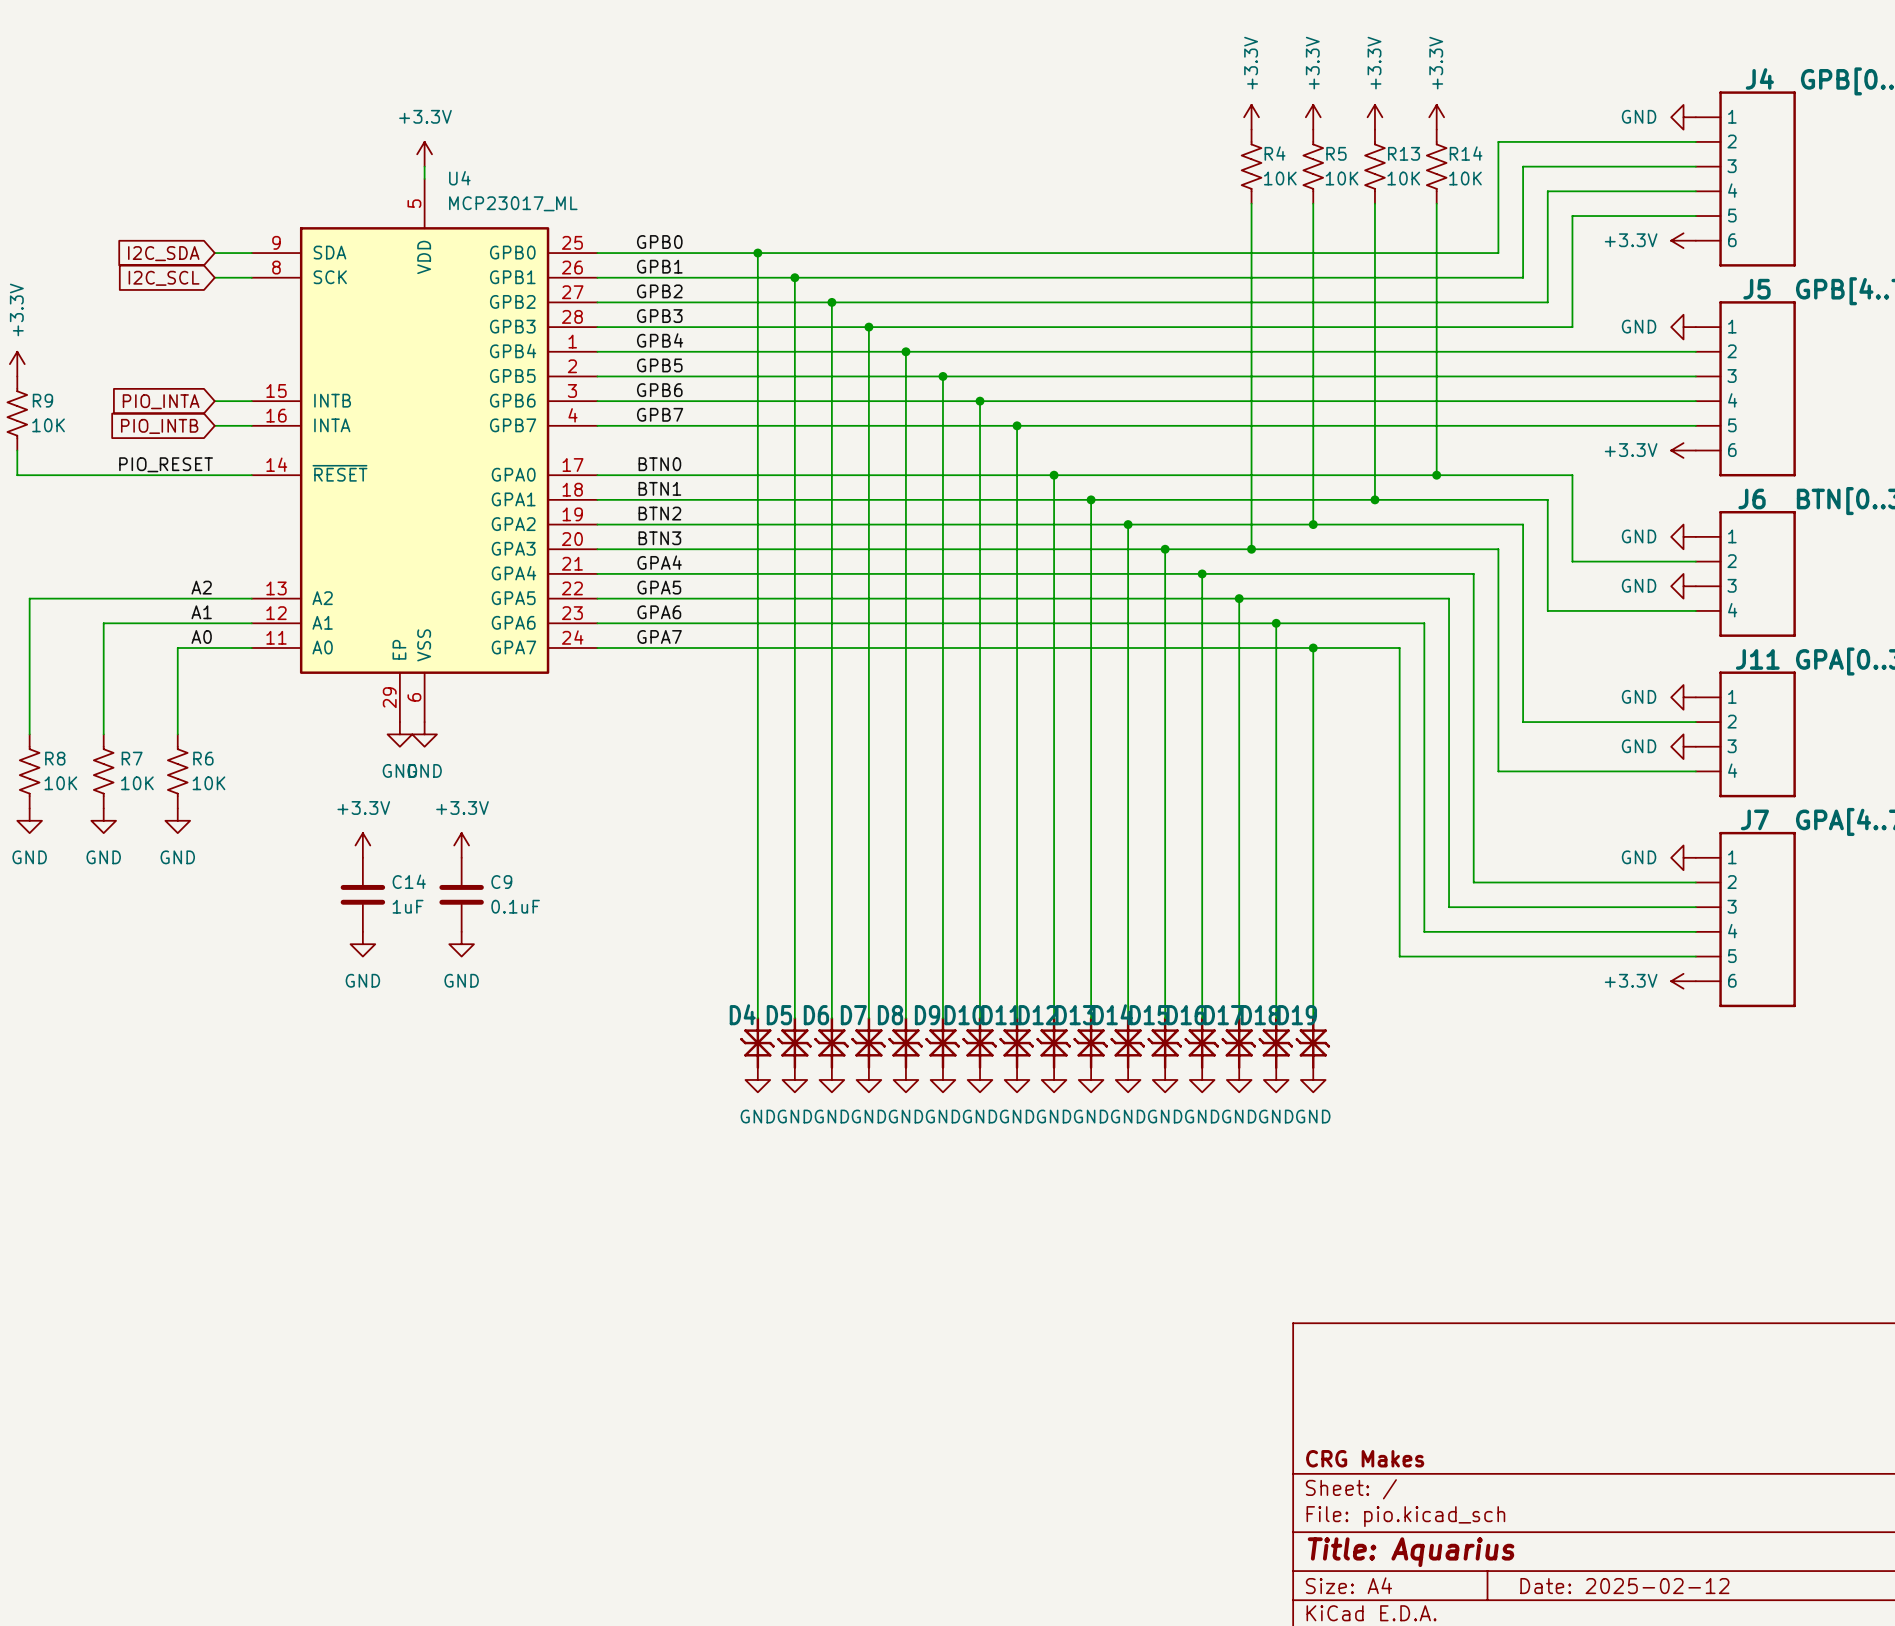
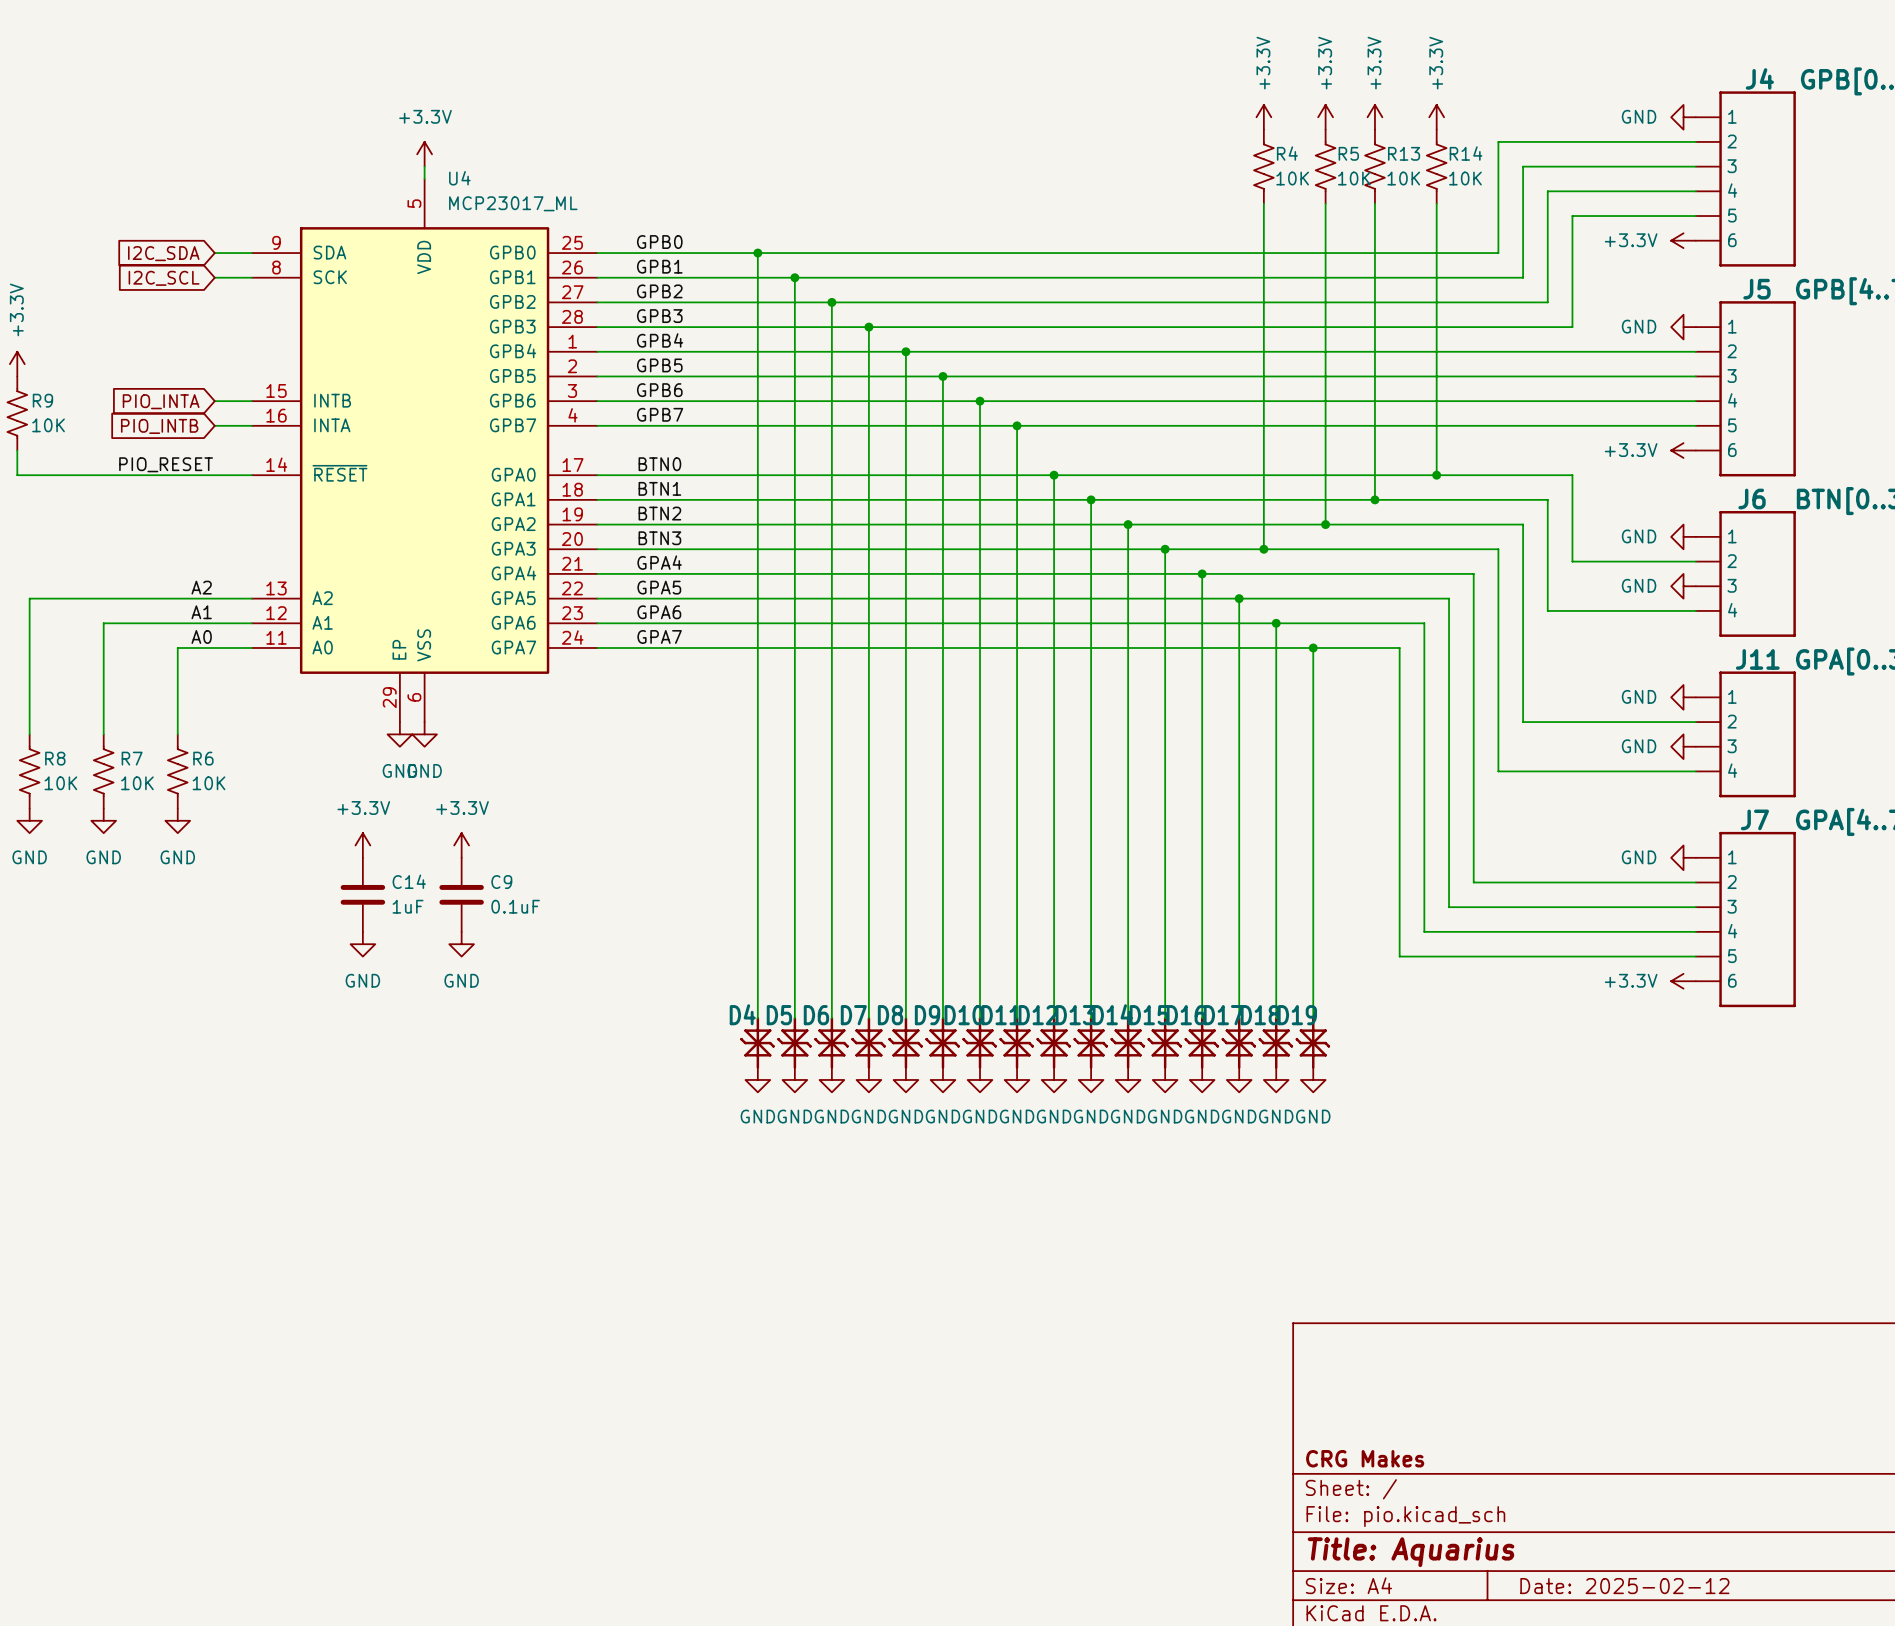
power symbol position: +3.3V (1251, 117) -> +3.3V (1263, 117)
power symbol position: +3.3V (1313, 117) -> +3.3V (1325, 117)
R4 position: (1251, 166) -> (1263, 166)
R5 position: (1313, 166) -> (1325, 166)
wire: (1251, 203) (1251, 549) -> (1263, 203) (1263, 549)
wire: (1313, 203) (1313, 524) -> (1325, 203) (1325, 524)
junction position: (1313, 524) -> (1325, 524)
junction position: (1251, 549) -> (1263, 549)

